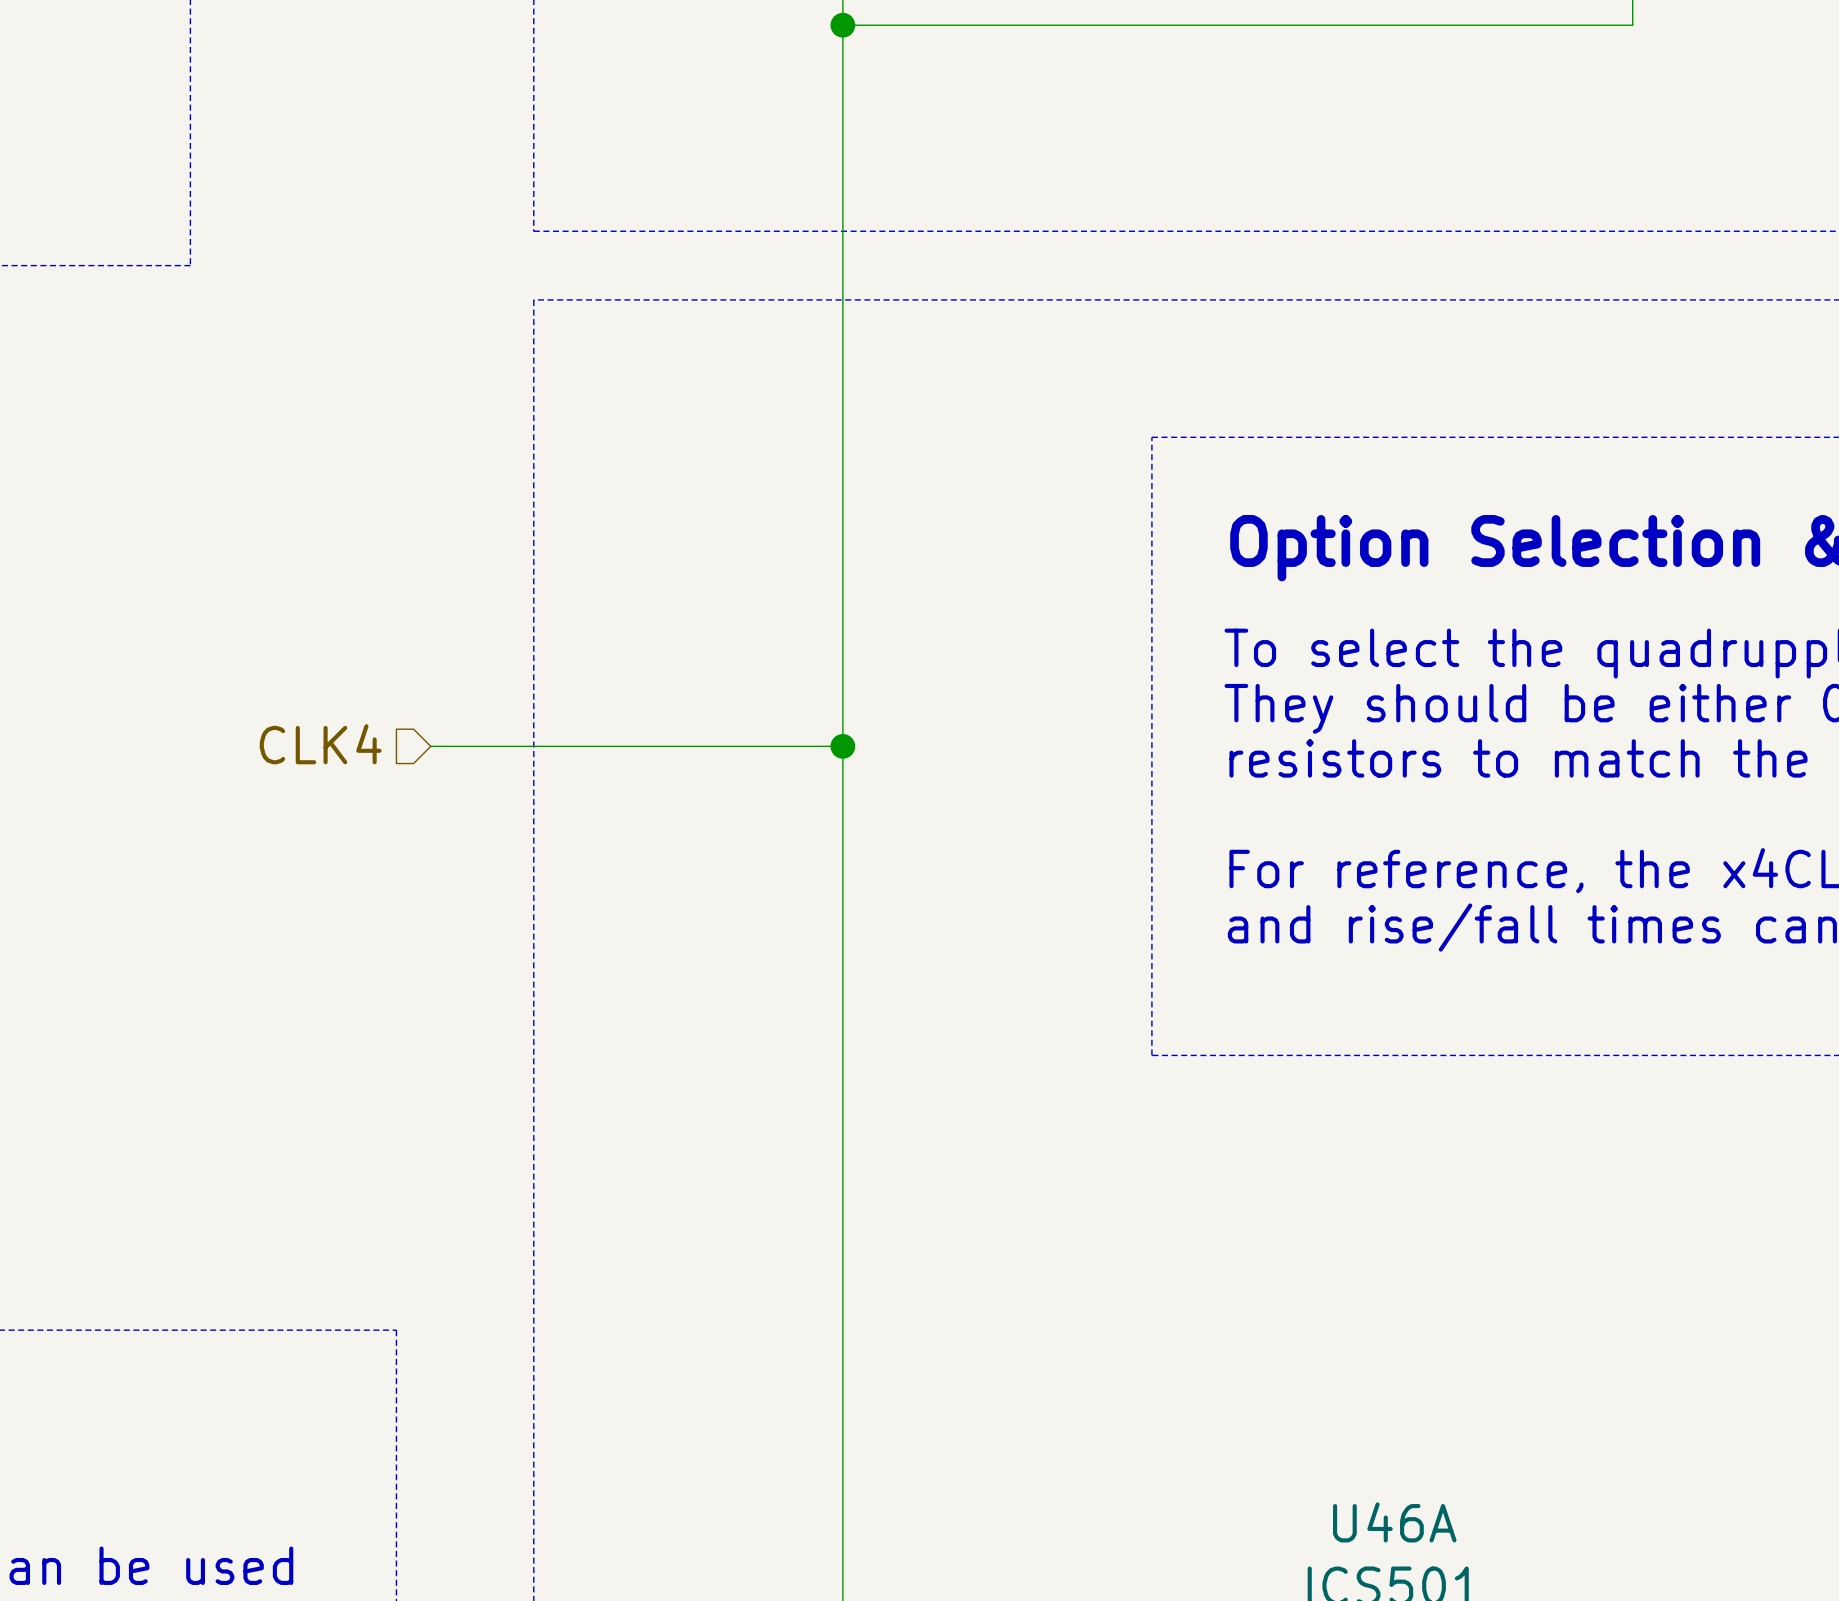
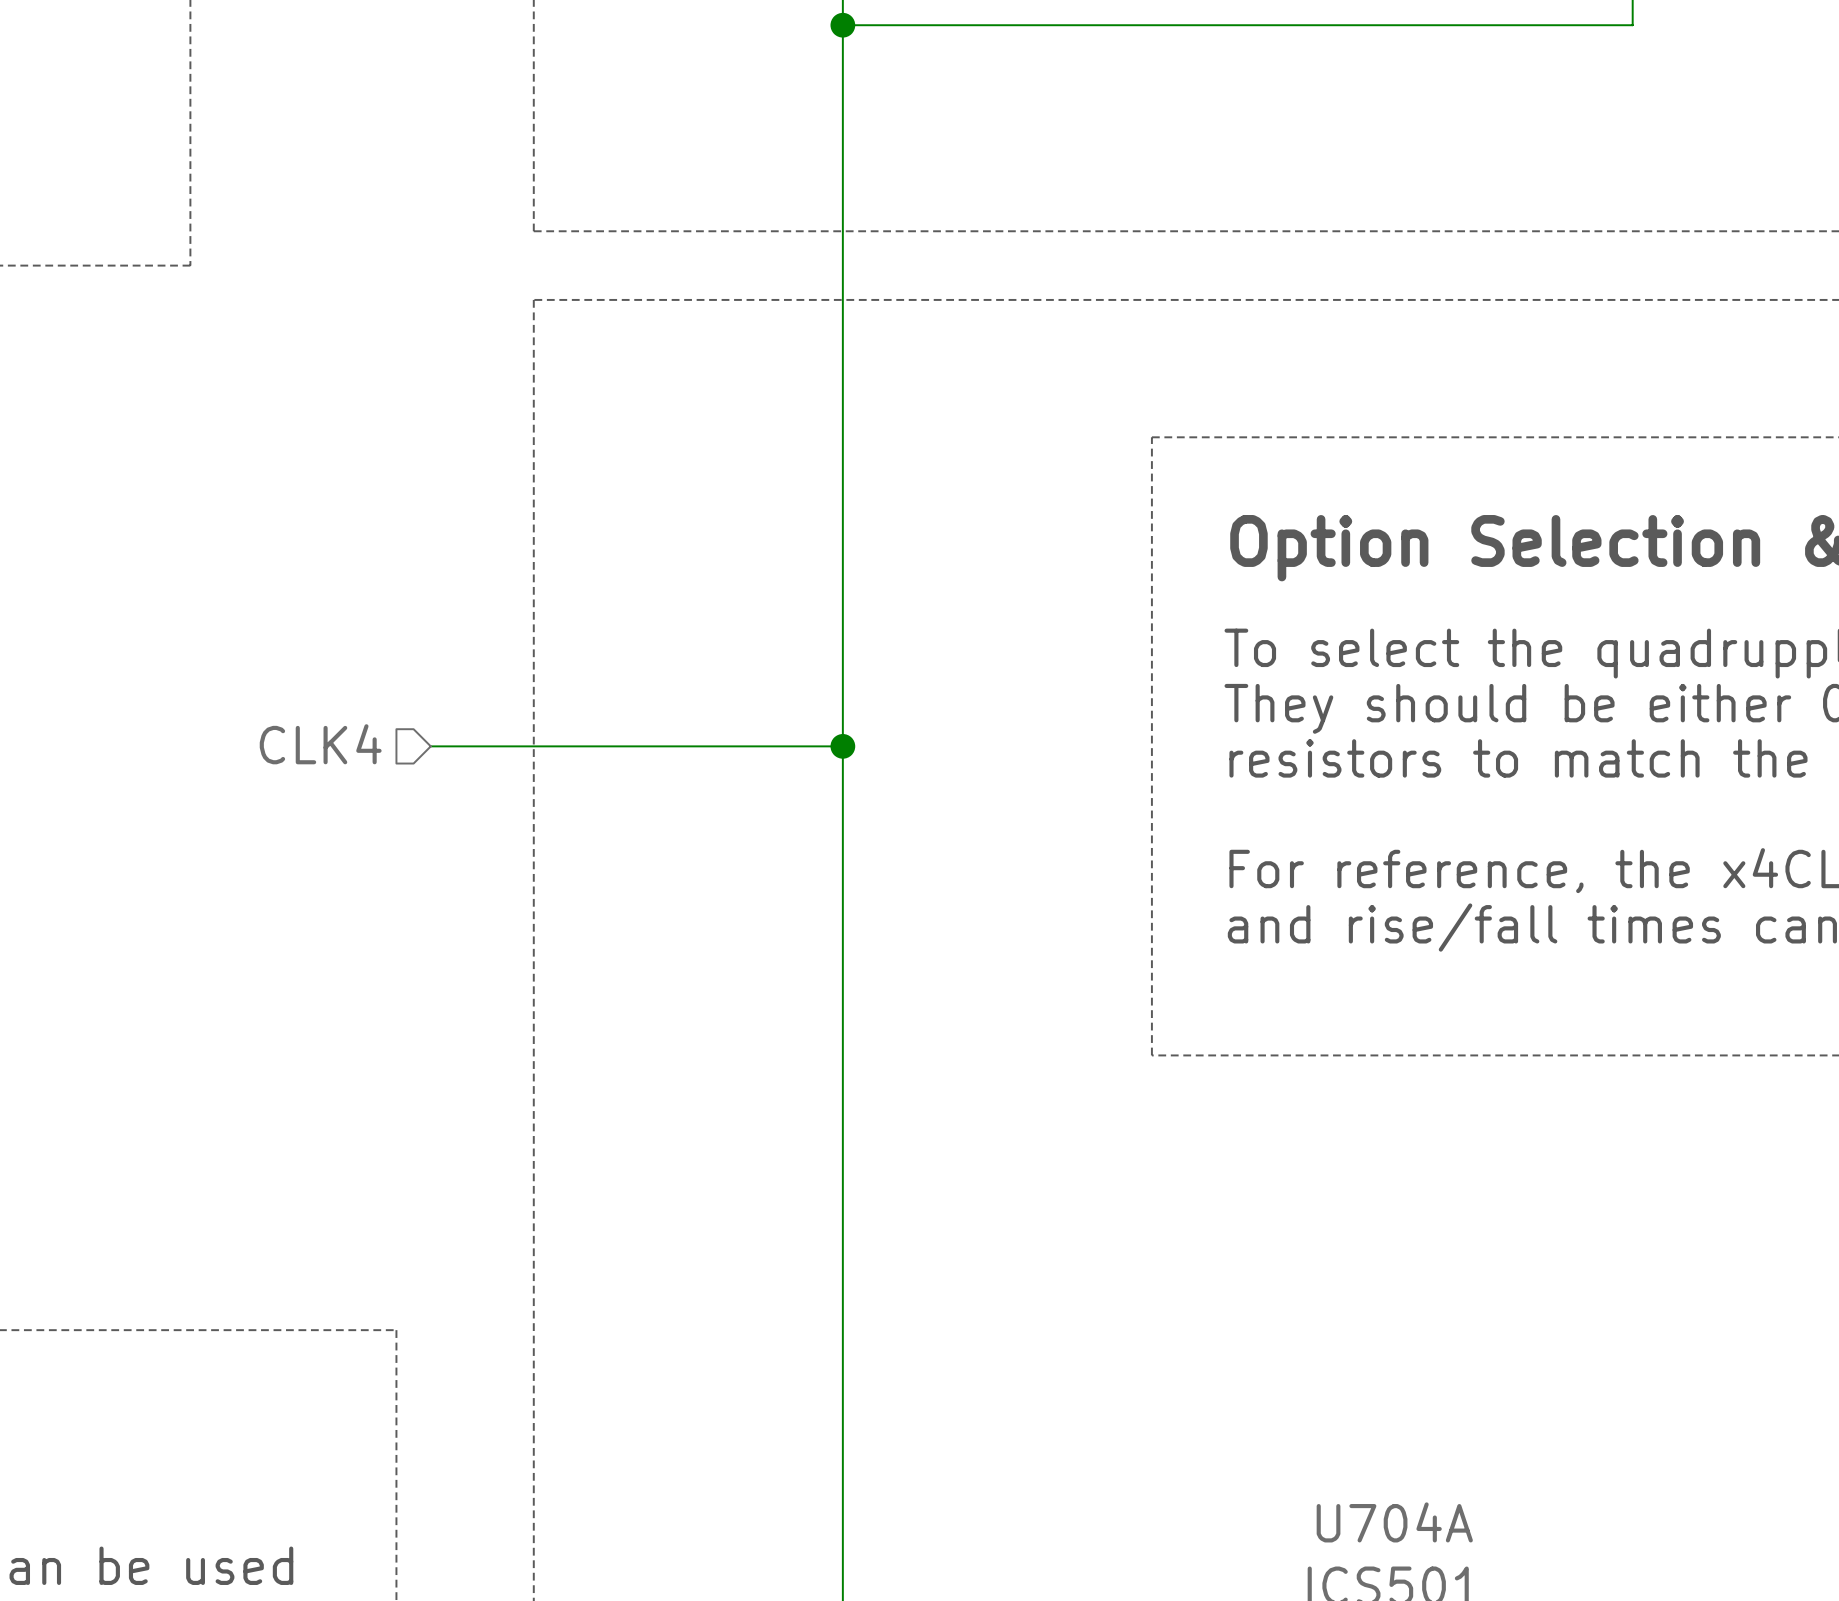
U46A name: U46A (1394, 1522) -> U704A (1394, 1522)

